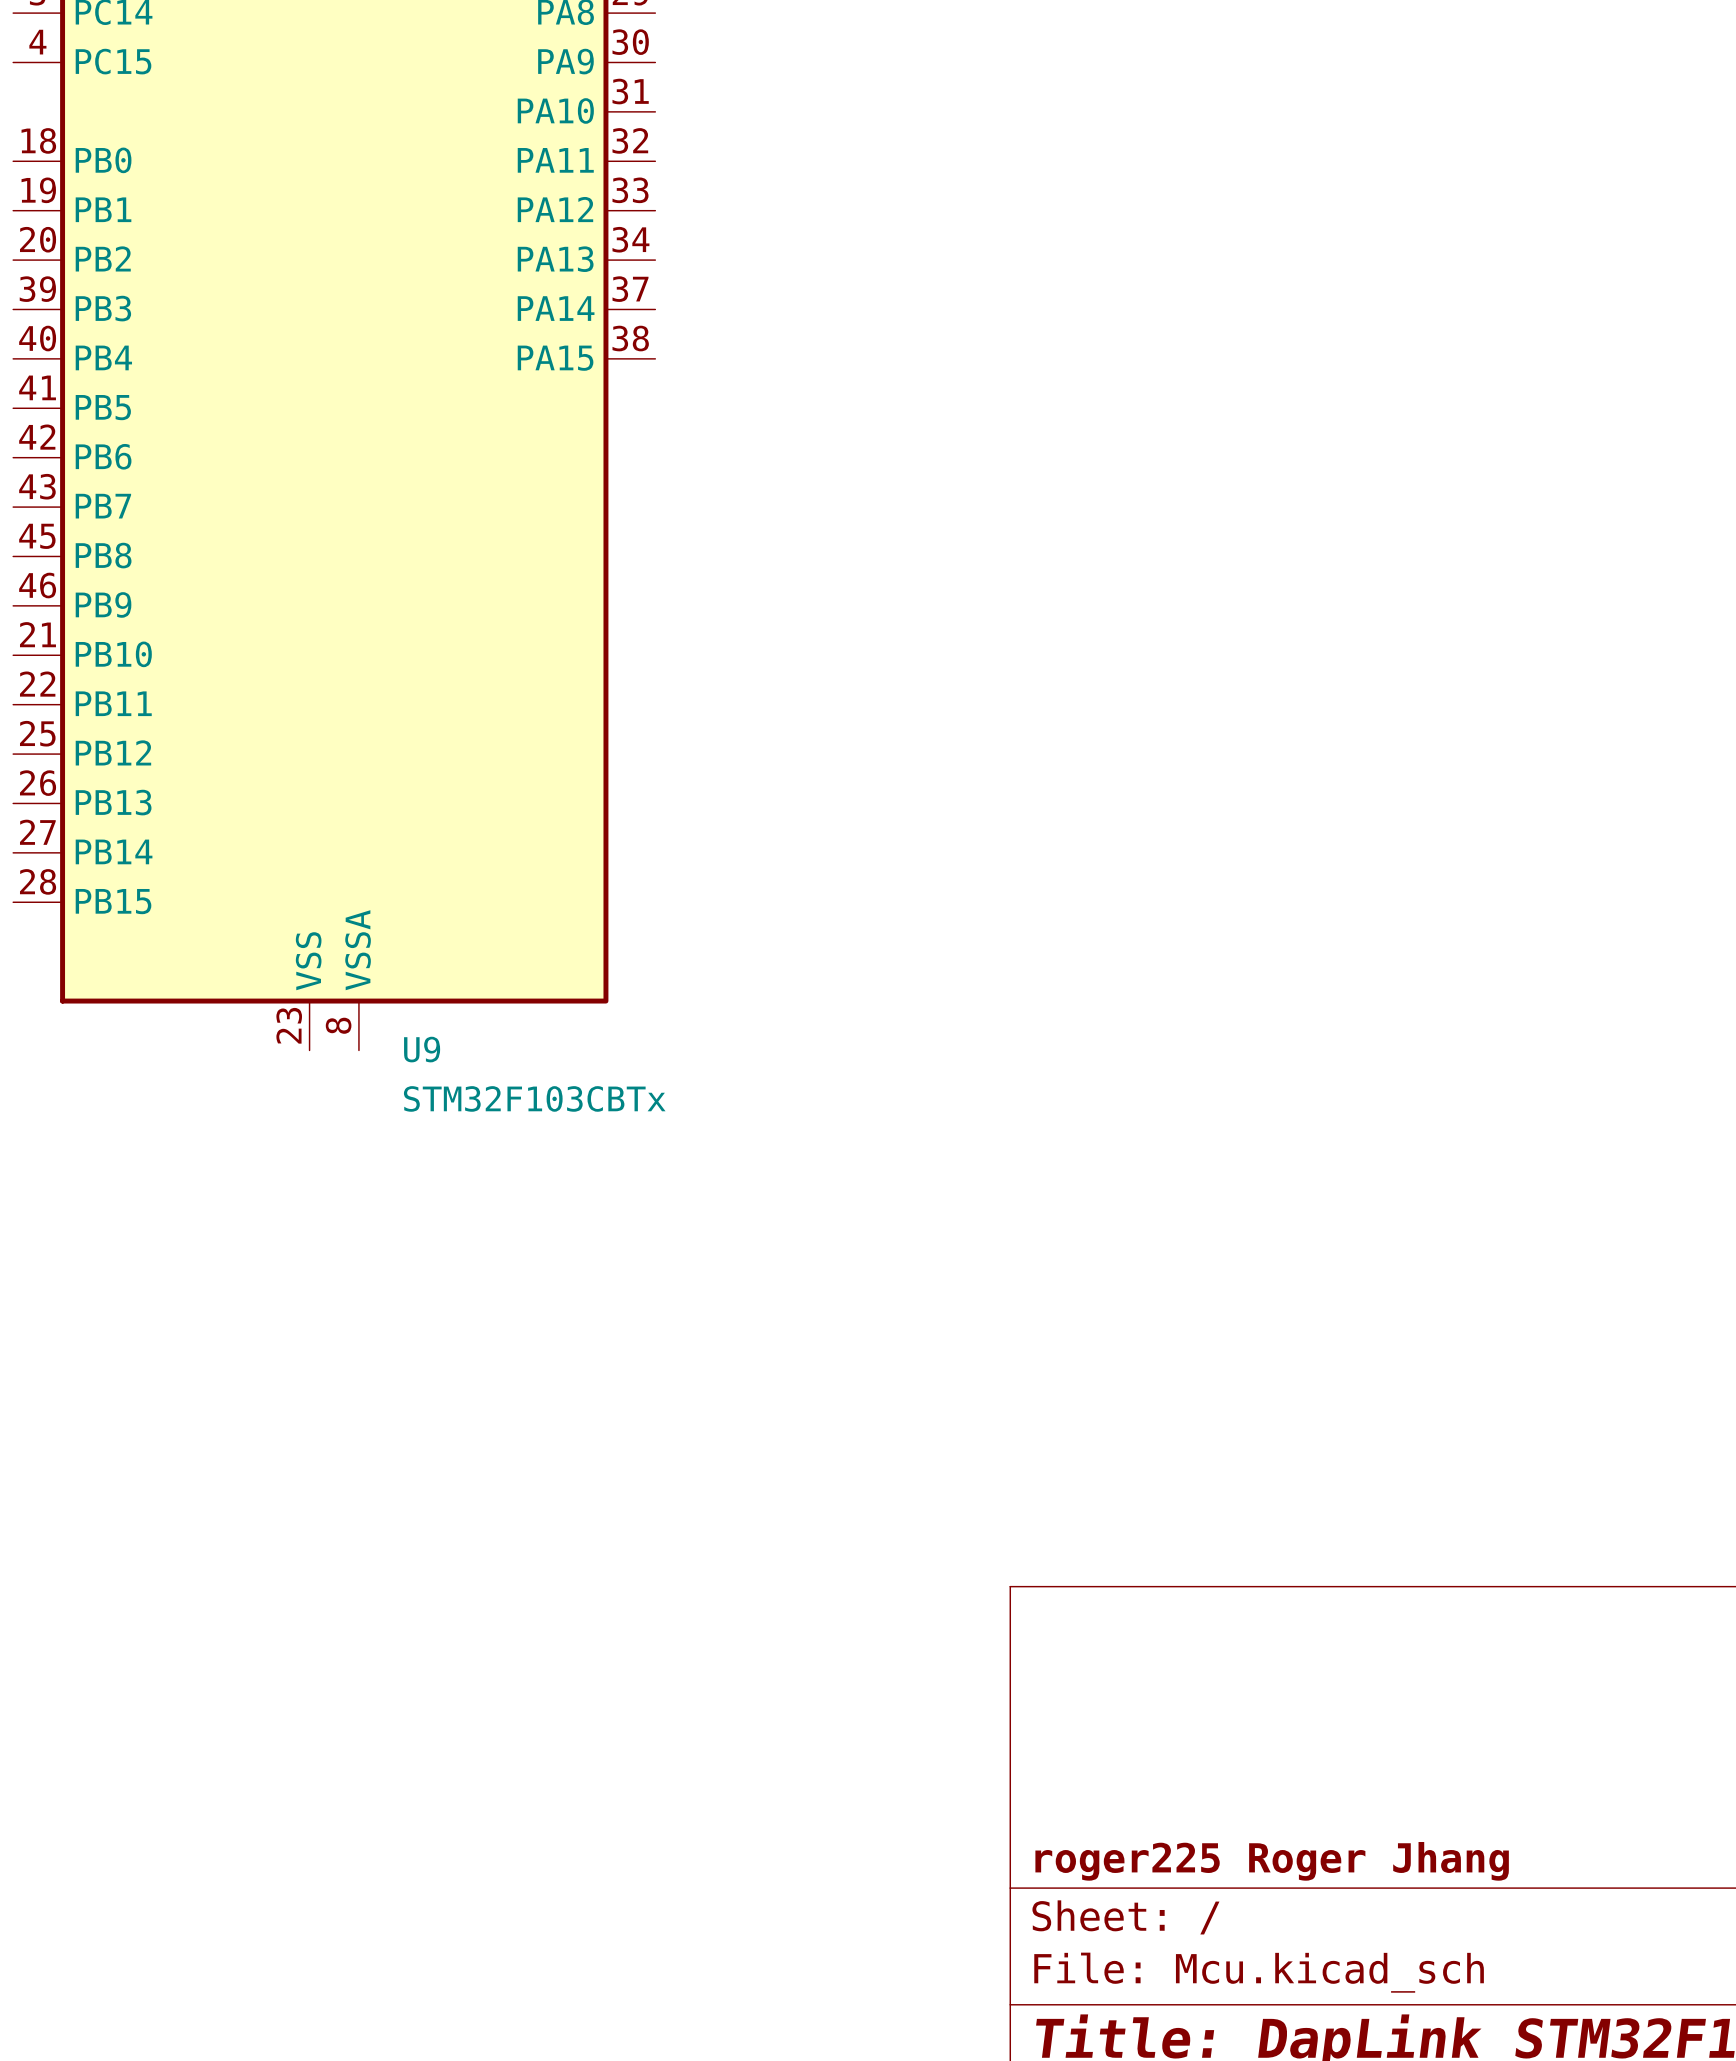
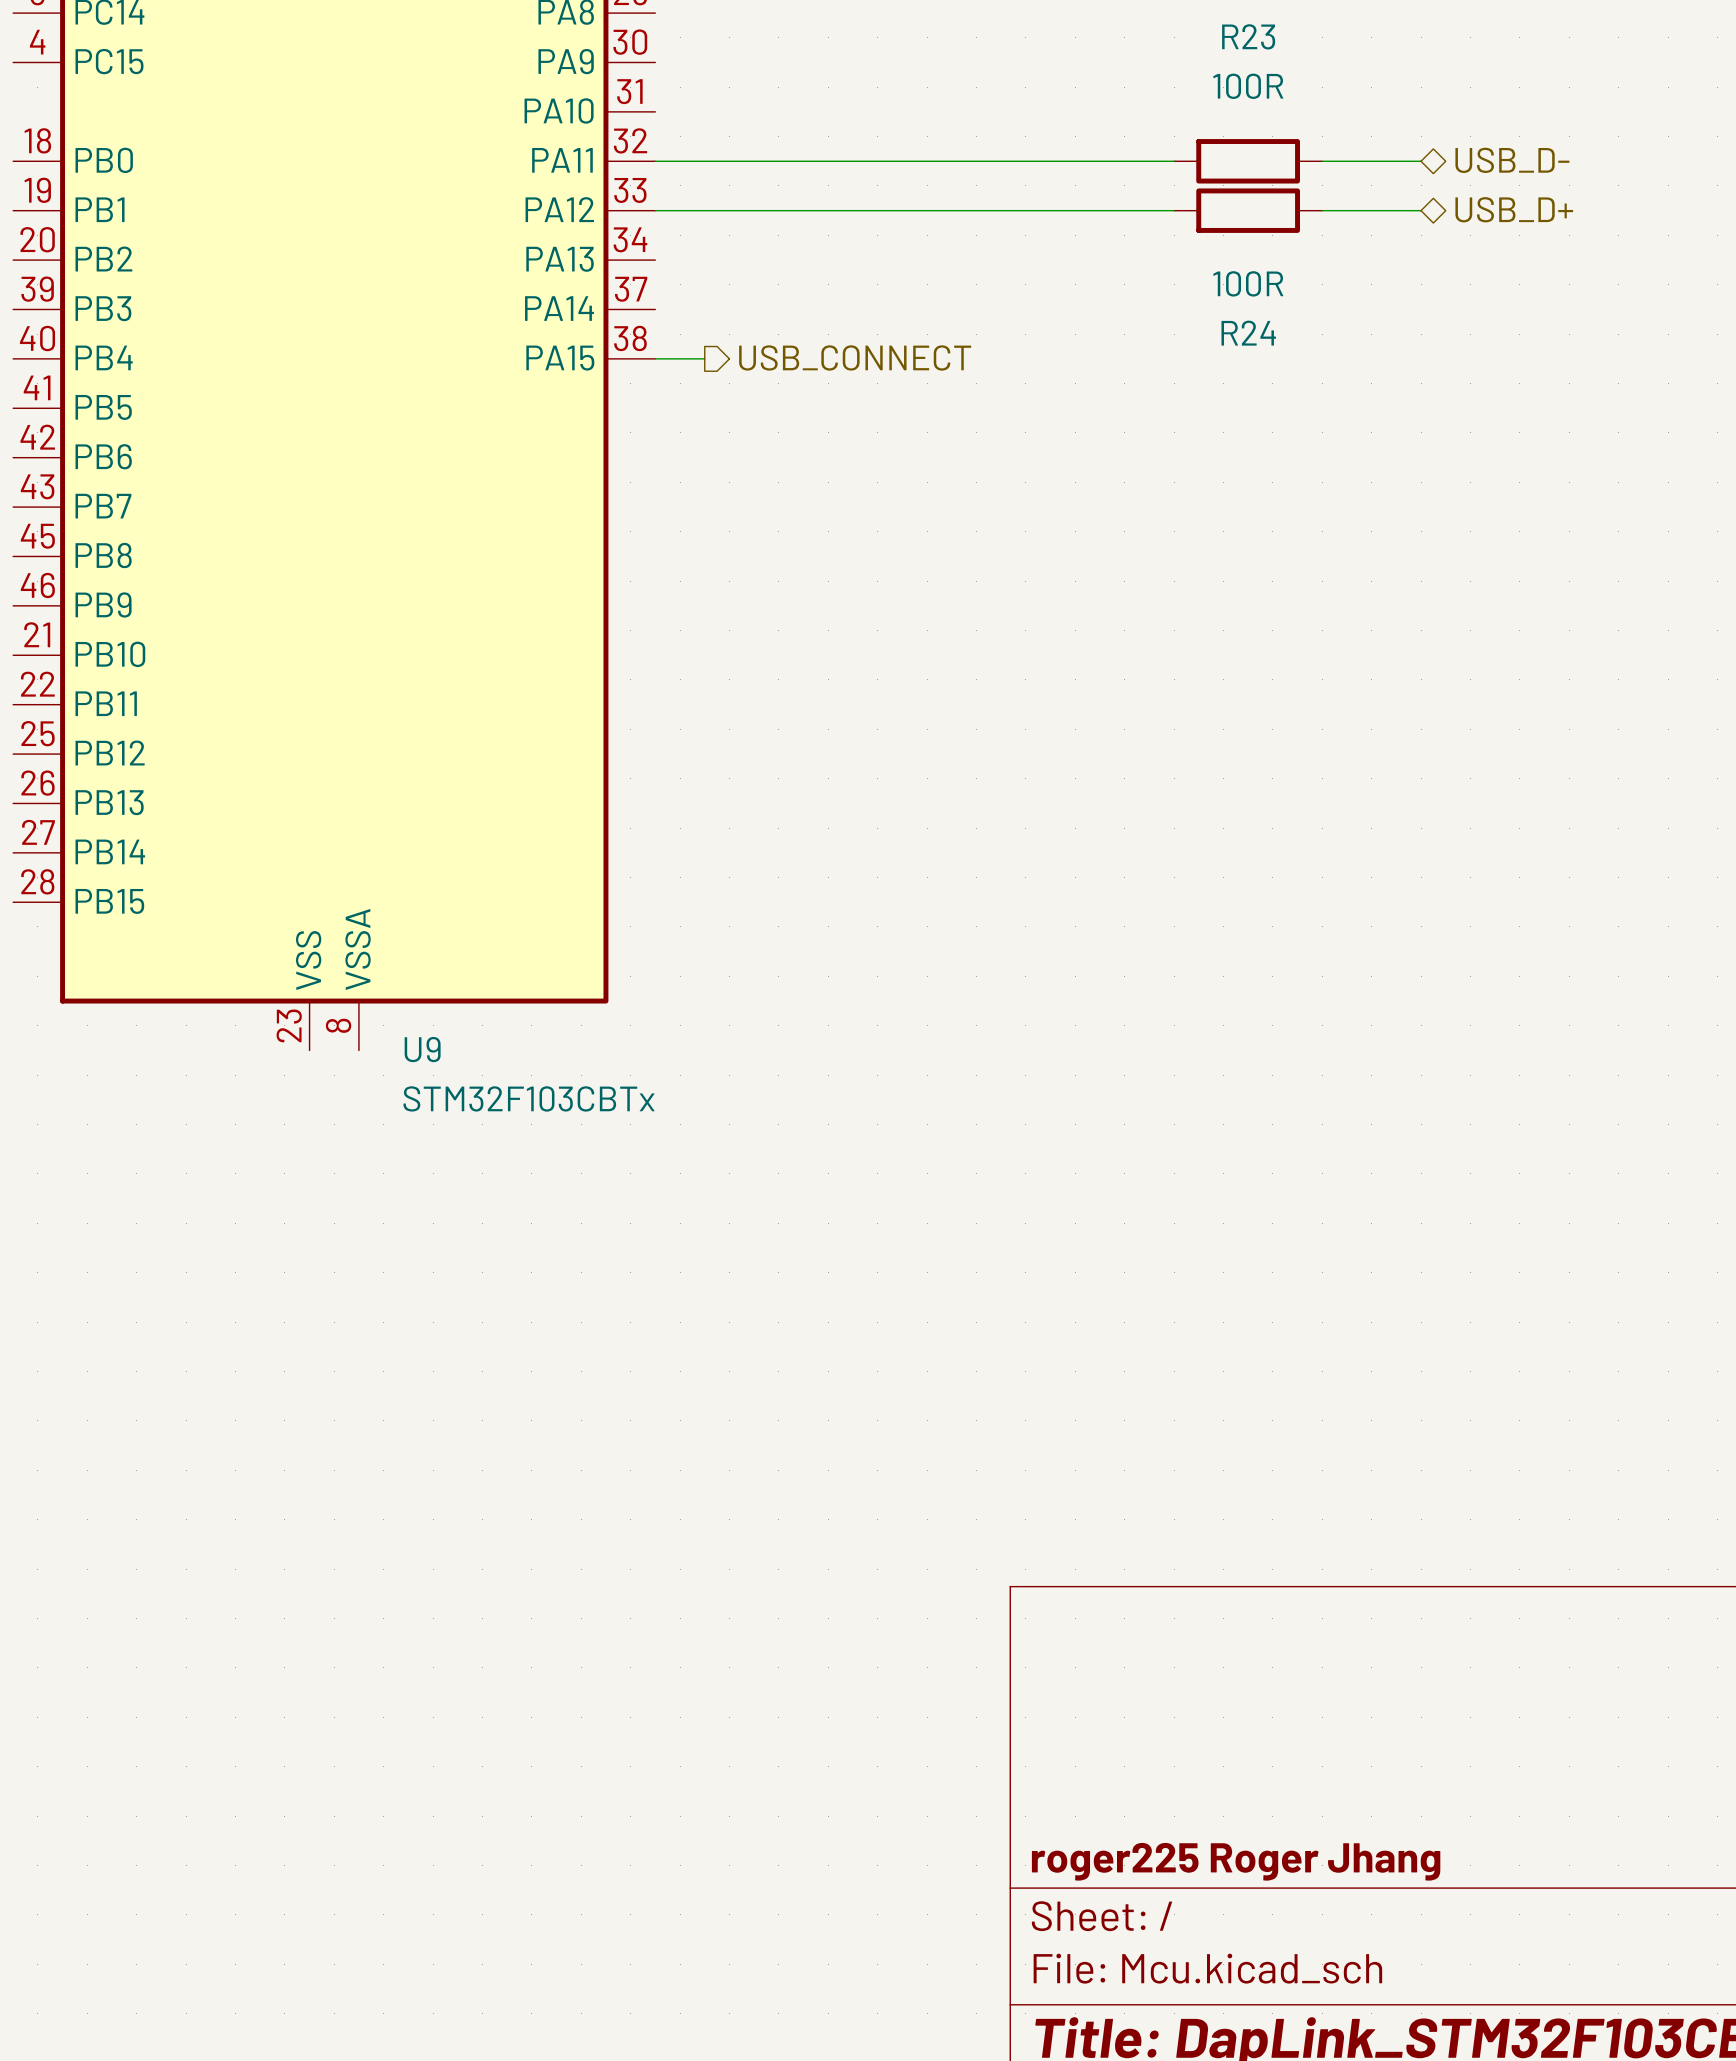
wire: none -> (655, 161) (1174, 161)
R23: none -> 100R (1248, 161)
wire: none -> (1322, 161) (1421, 161)
hierarchical label: none -> USB_D- (1512, 160)
wire: none -> (655, 210) (1174, 210)
R24: none -> 100R (1248, 210)
wire: none -> (1322, 210) (1421, 210)
hierarchical label: none -> USB_D+ (1514, 209)
wire: none -> (655, 358) (704, 358)
hierarchical label: none -> USB_CONNECT (855, 357)

